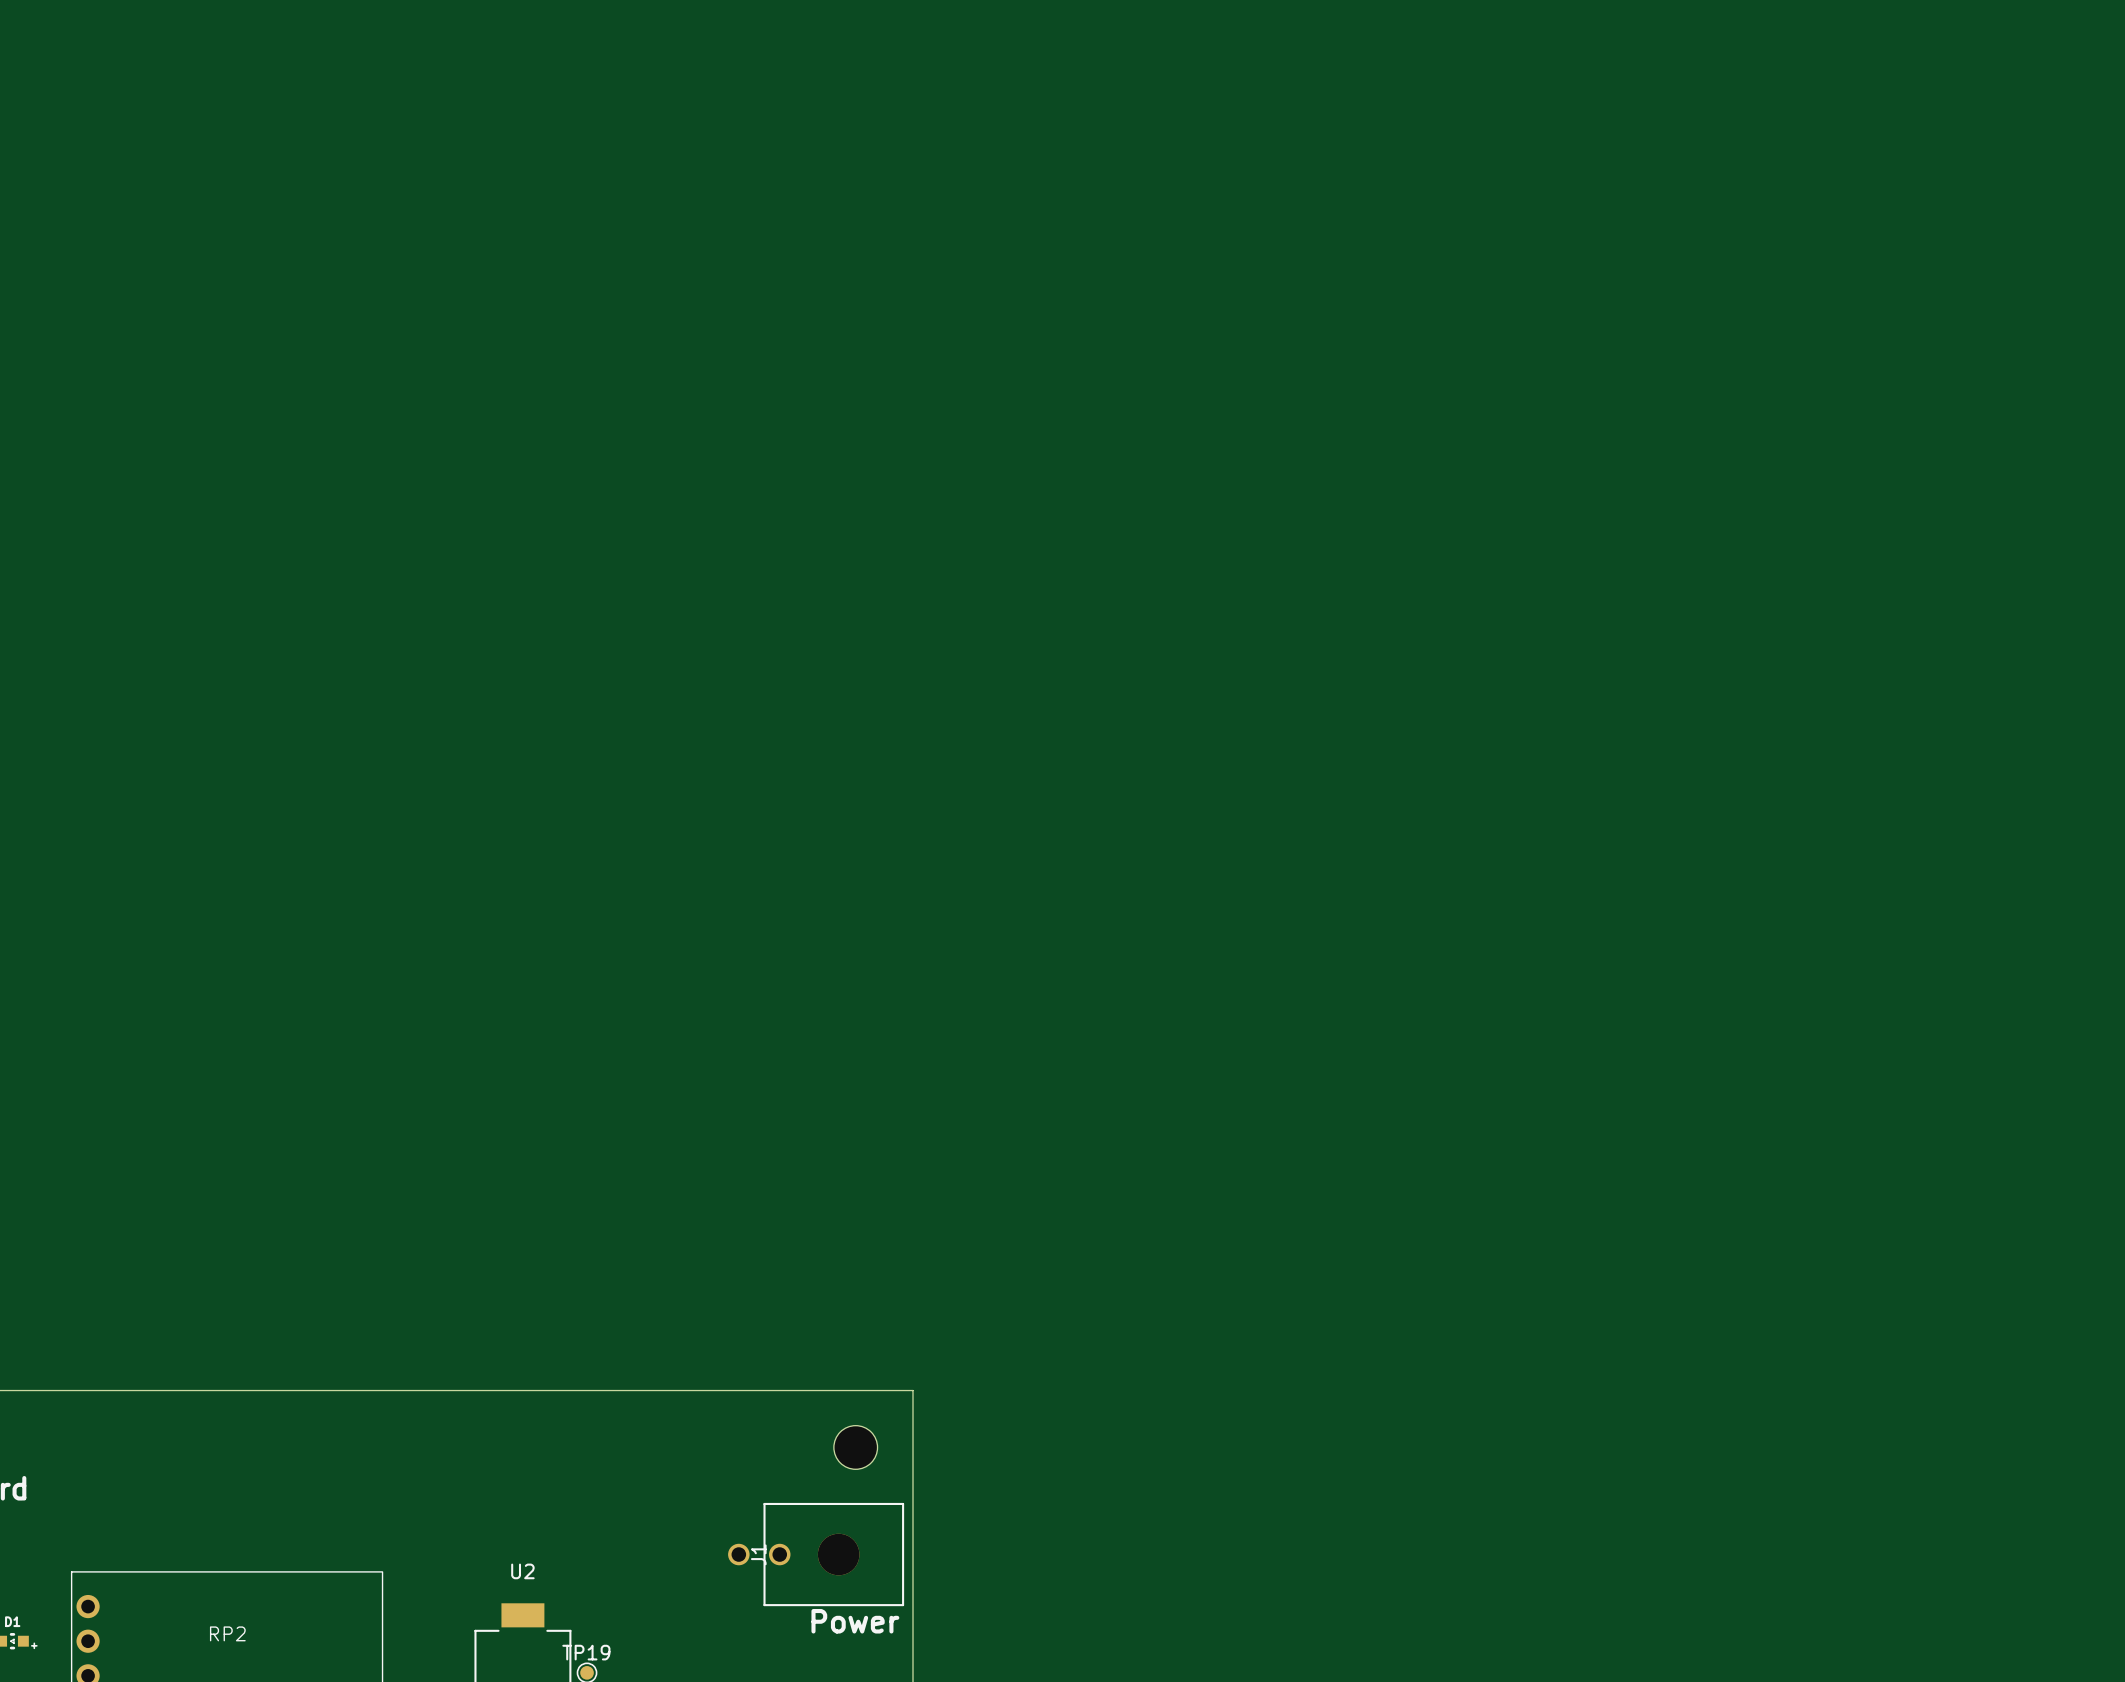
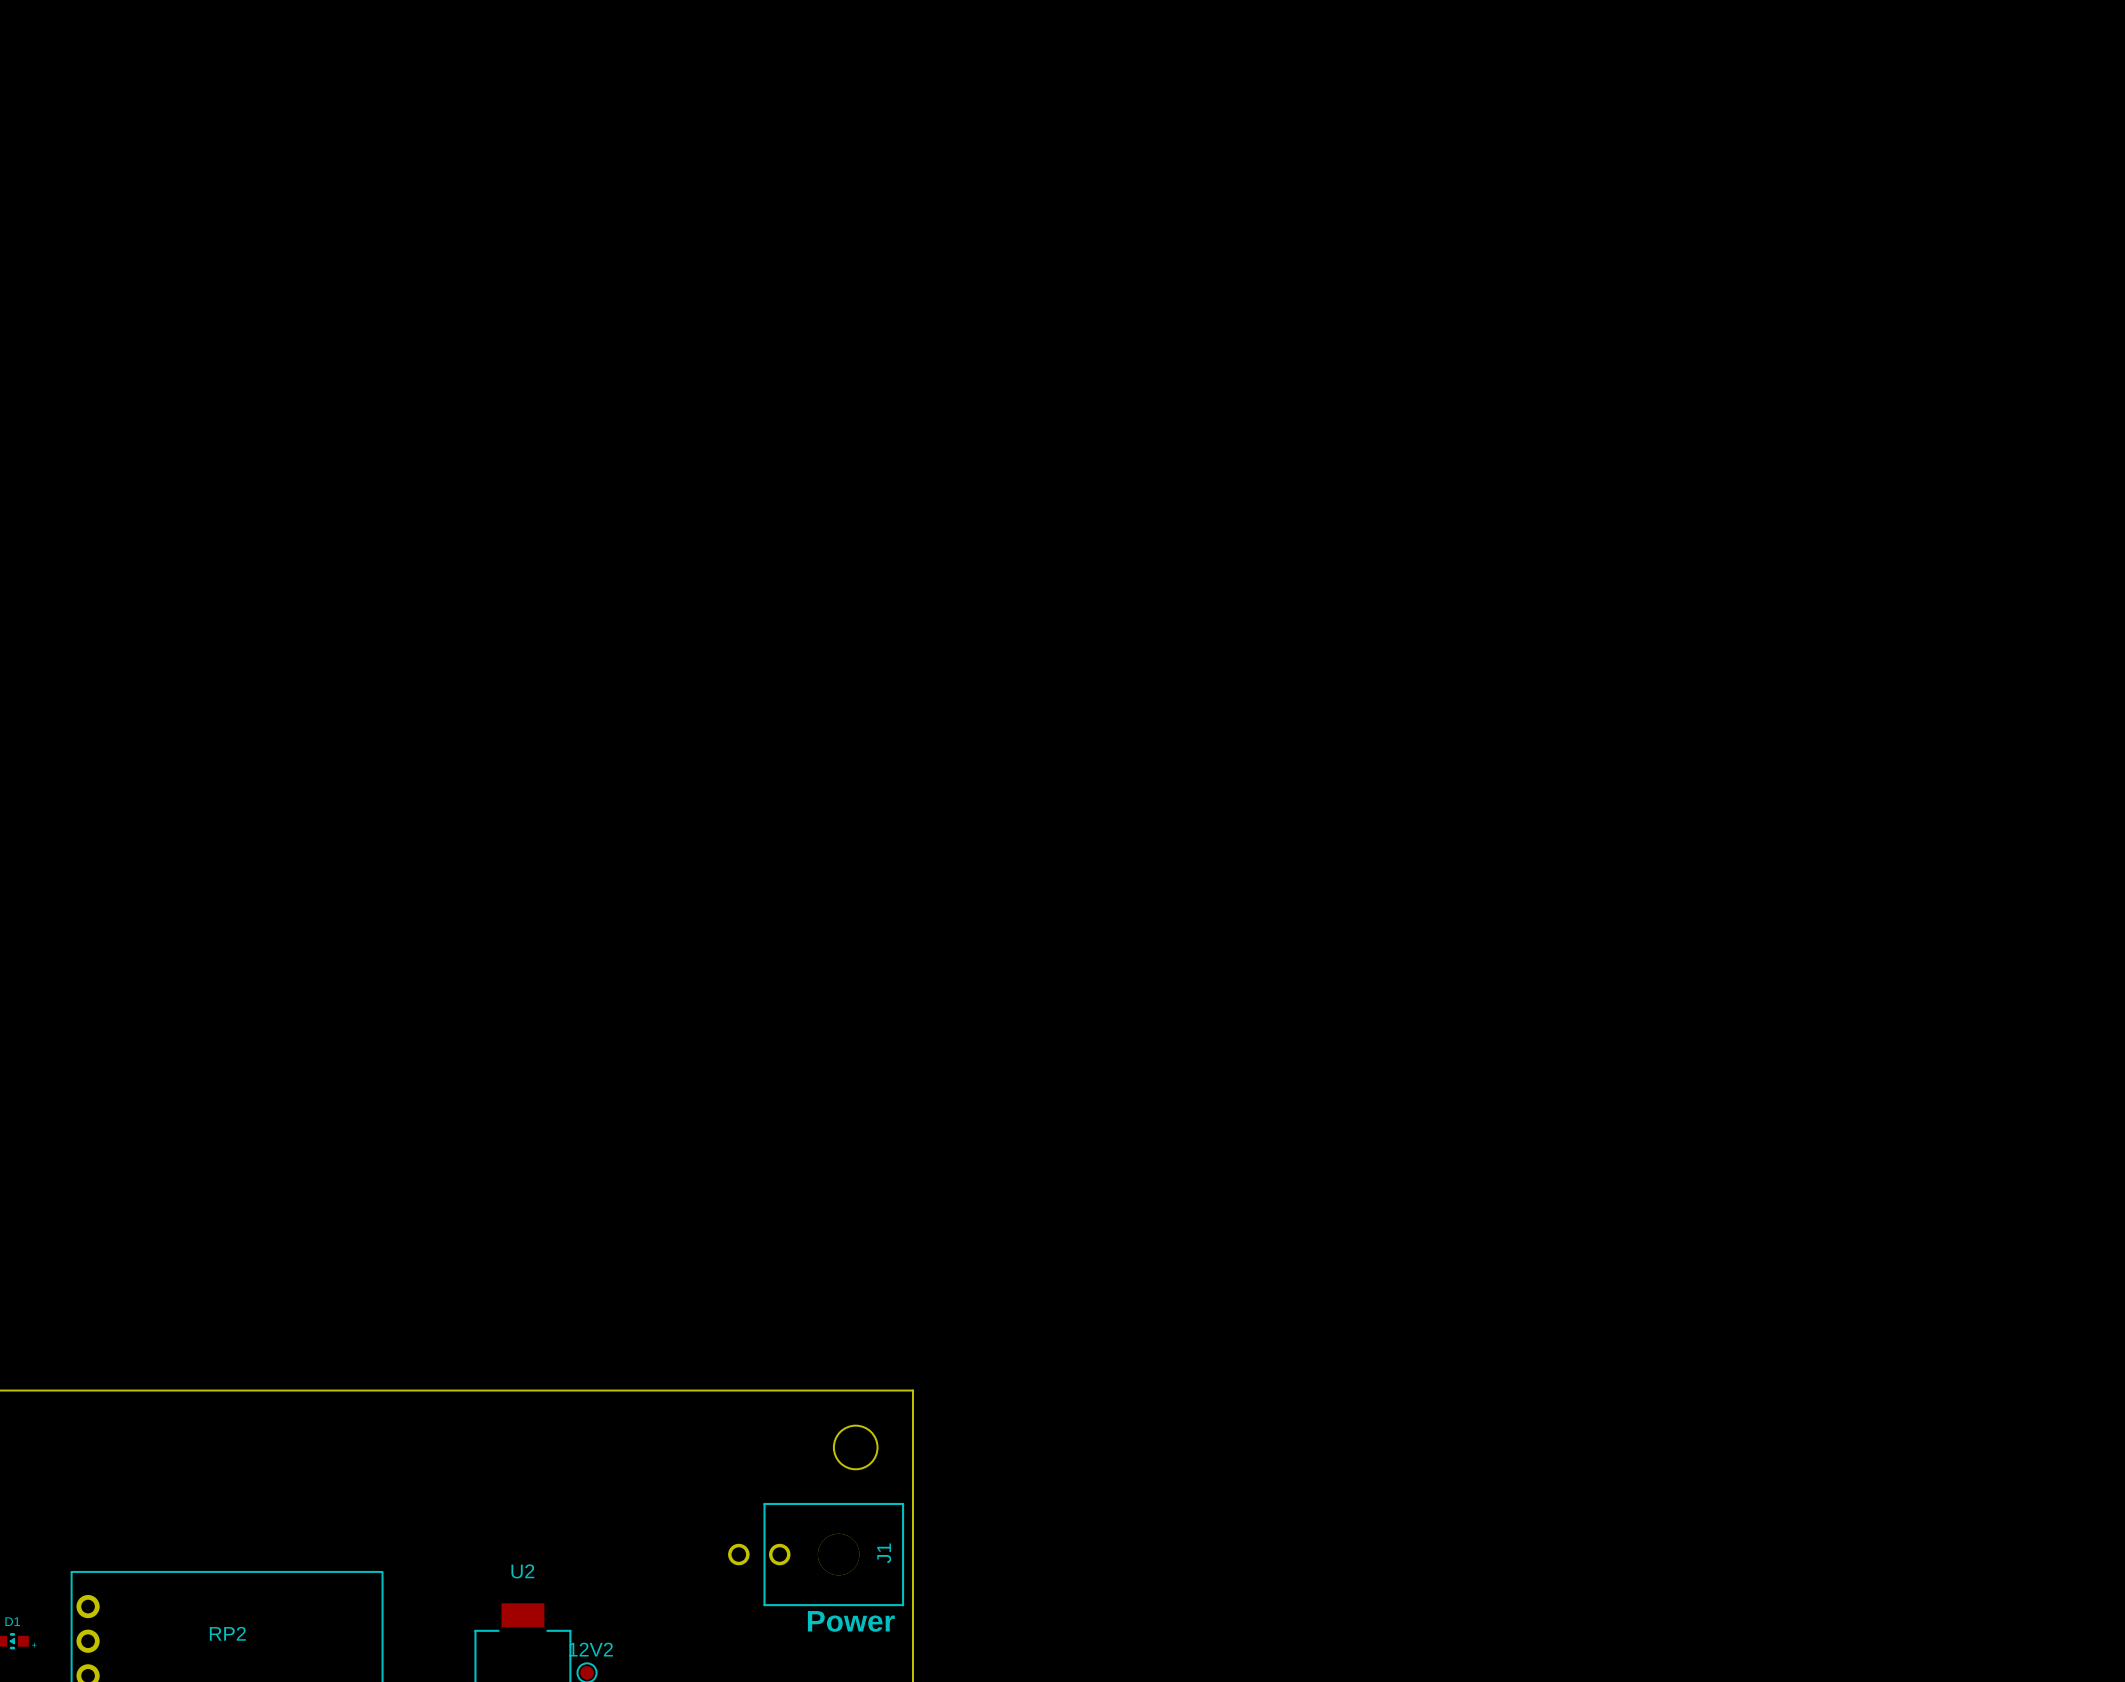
J1 name position: J1 (758, 1554) -> J1 (884, 1553)
TP19 name: TP19 (586, 1652) -> 12V2 (590, 1649)

